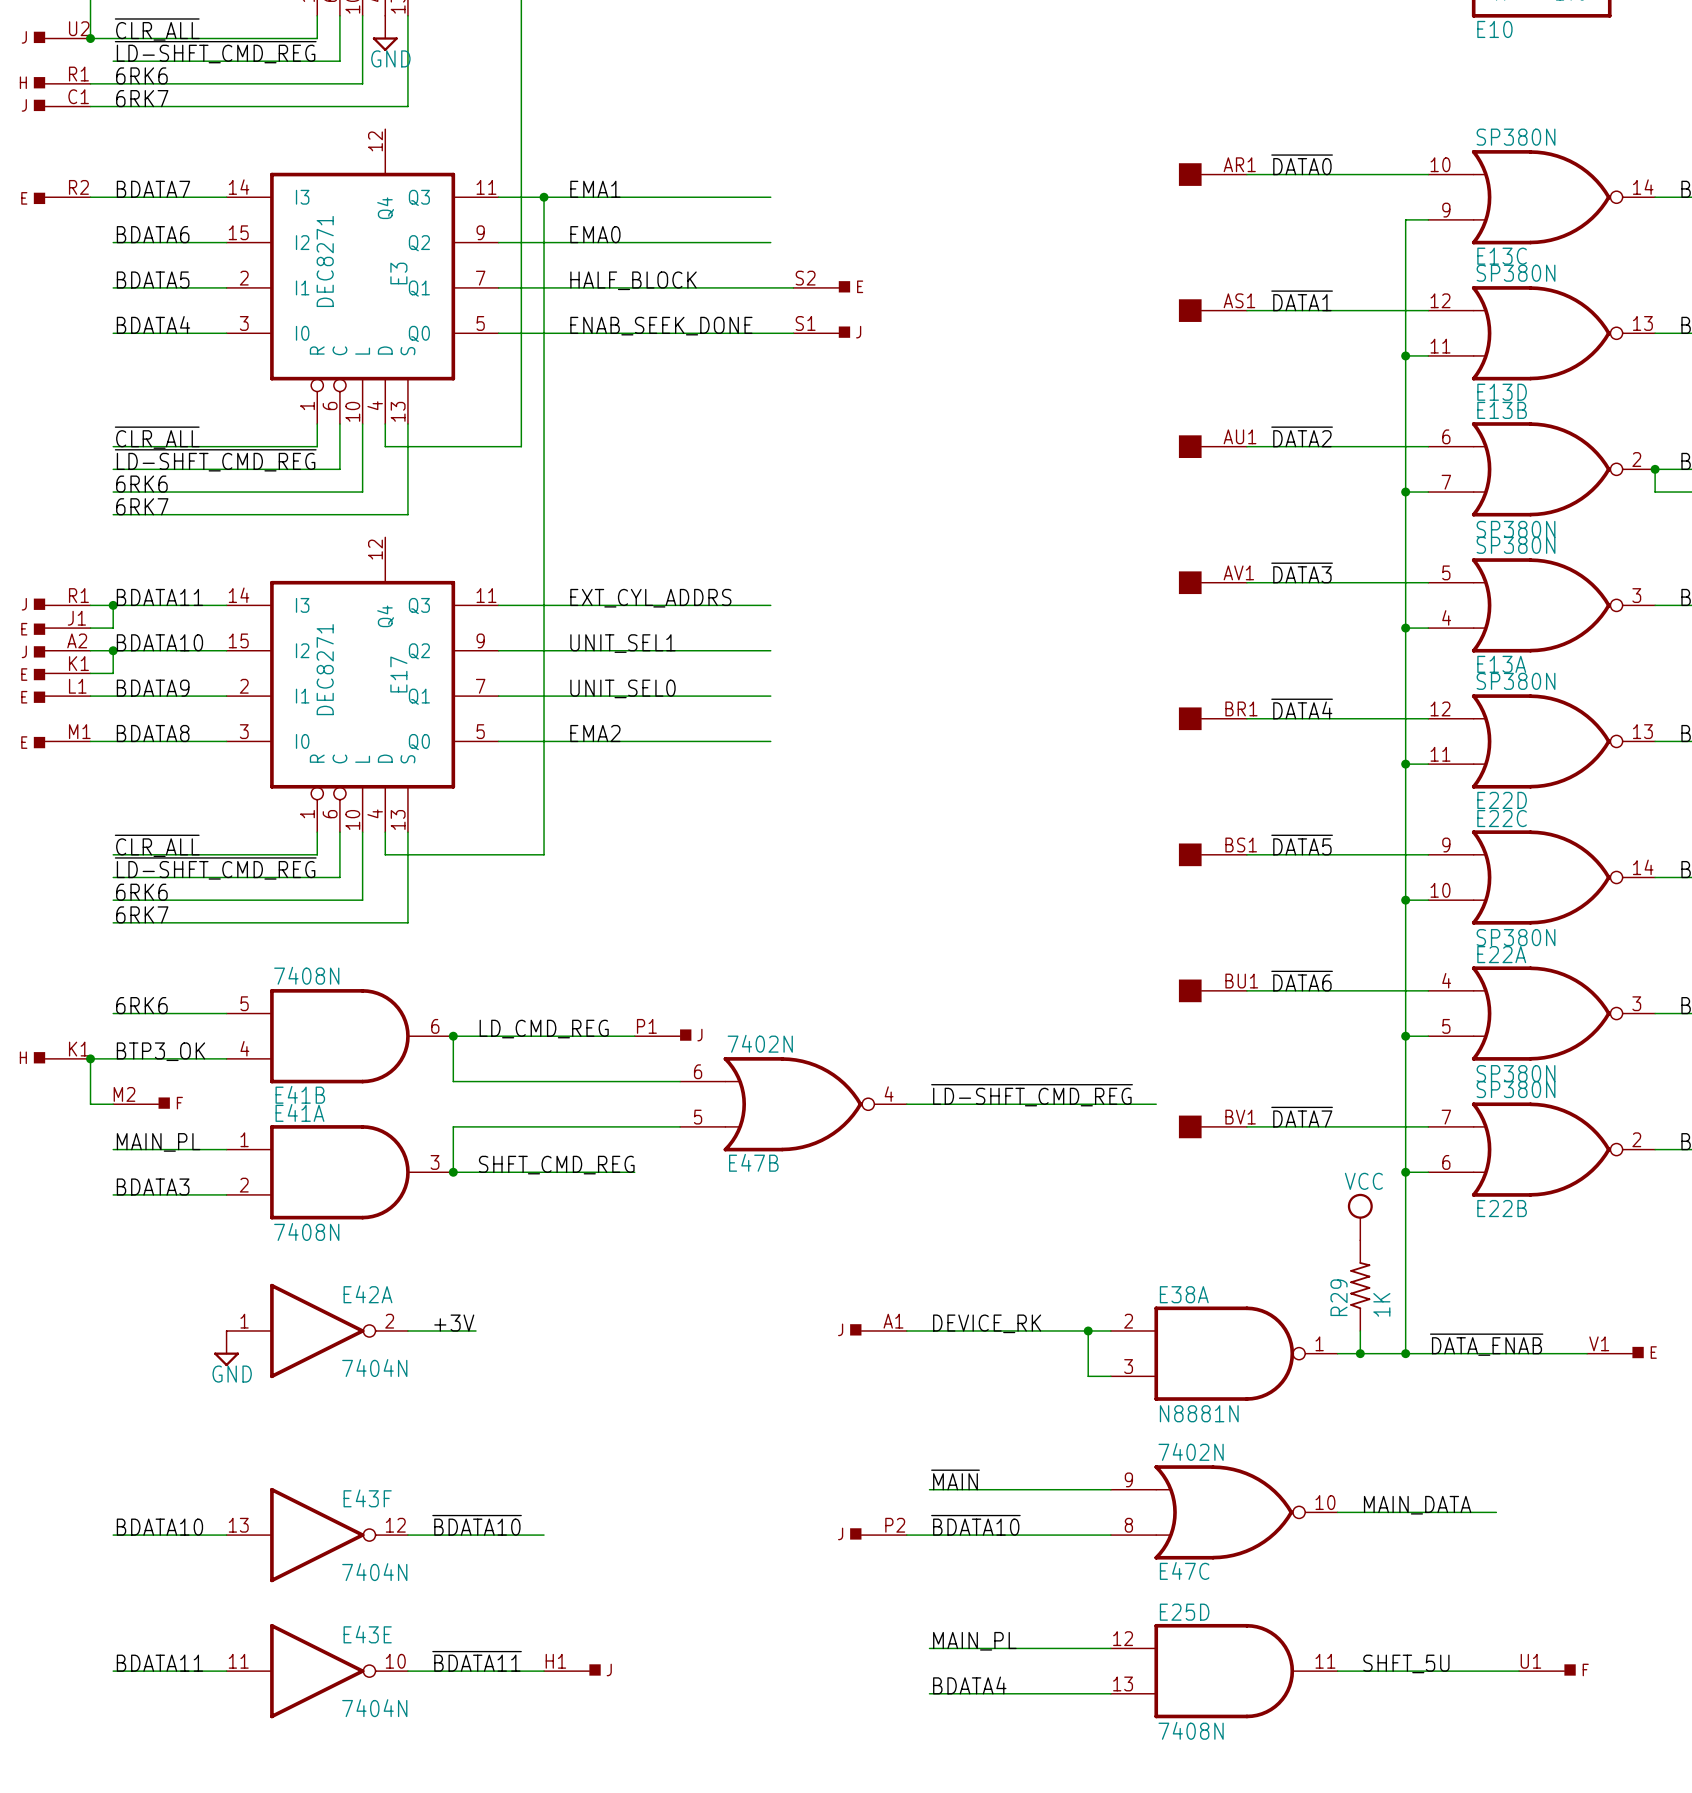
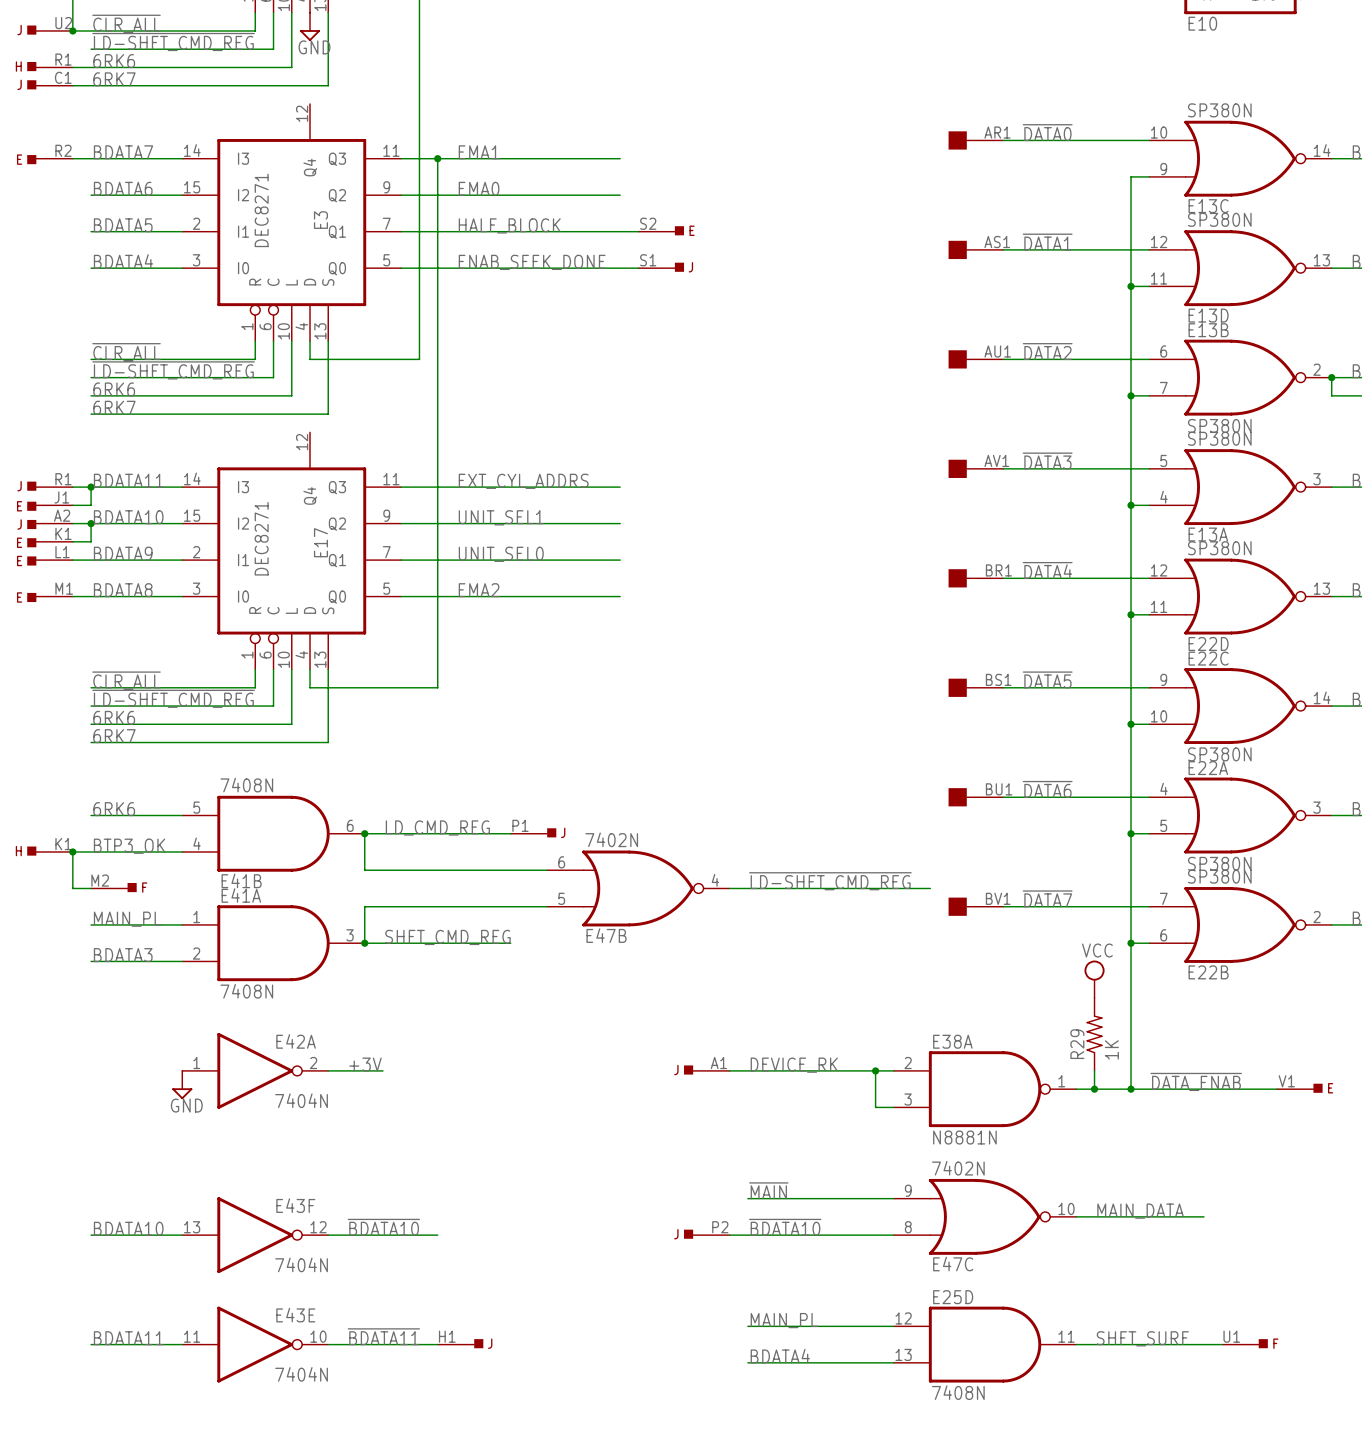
label: SHFT_5U (1406, 1663) -> SHFT_SURF (1142, 1338)

